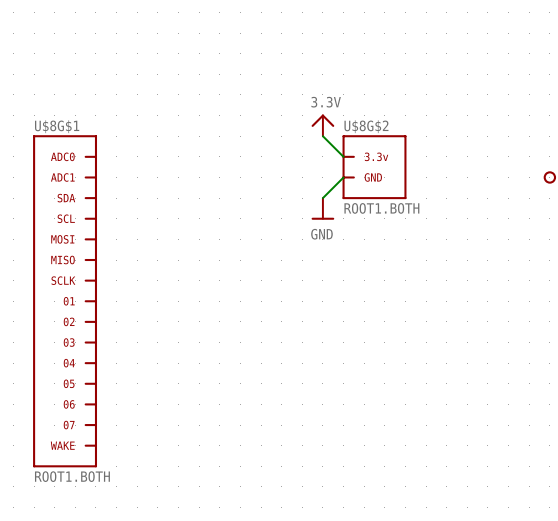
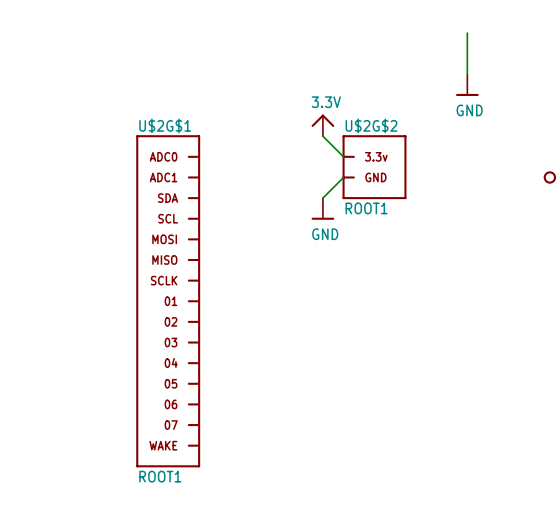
wire: none -> (467, 33) (467, 74)
power symbol: none -> GND (467, 85)
U$8G$2 name: U$8G$2 (366, 126) -> U$2G$2 (371, 125)
U$8G$2 value: ROOT1.BOTH (381, 208) -> ROOT1 (366, 208)
U$8G$1: ROOT1.BOTH (65, 301) -> none
U$2G$1: none -> ROOT1 (168, 301)

